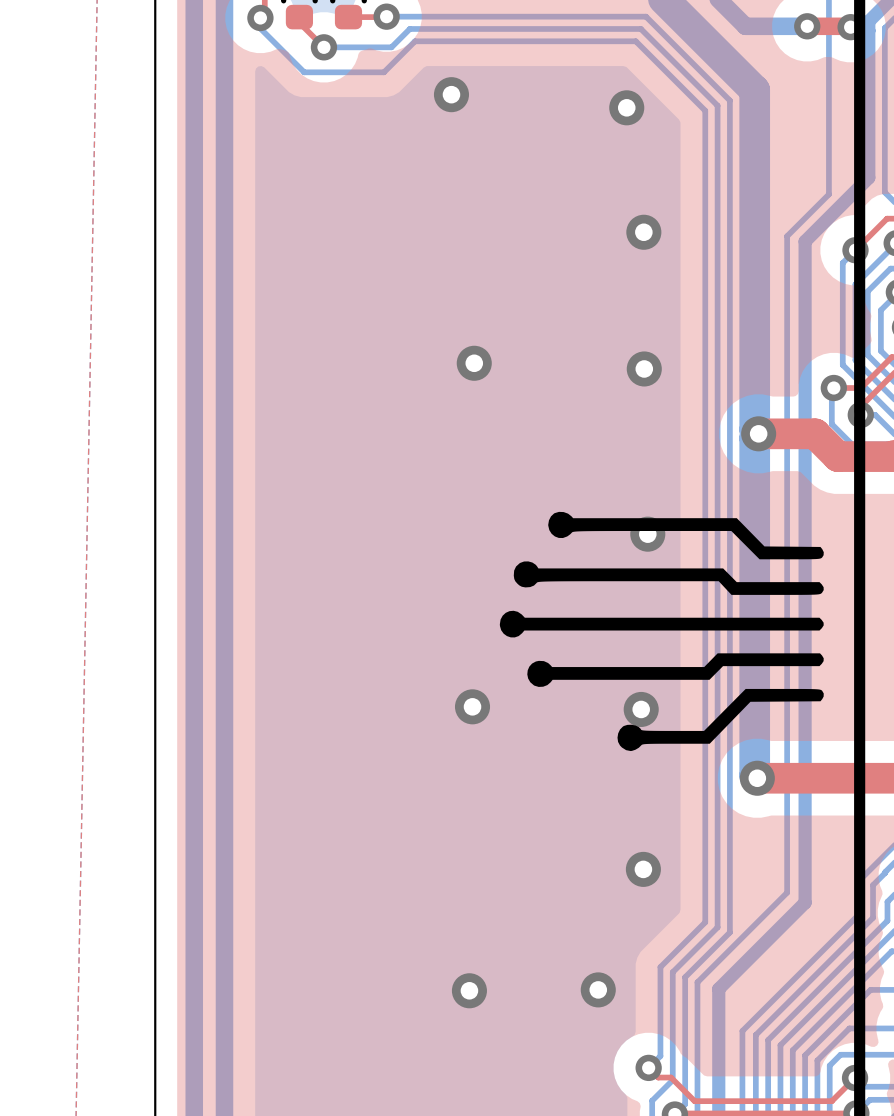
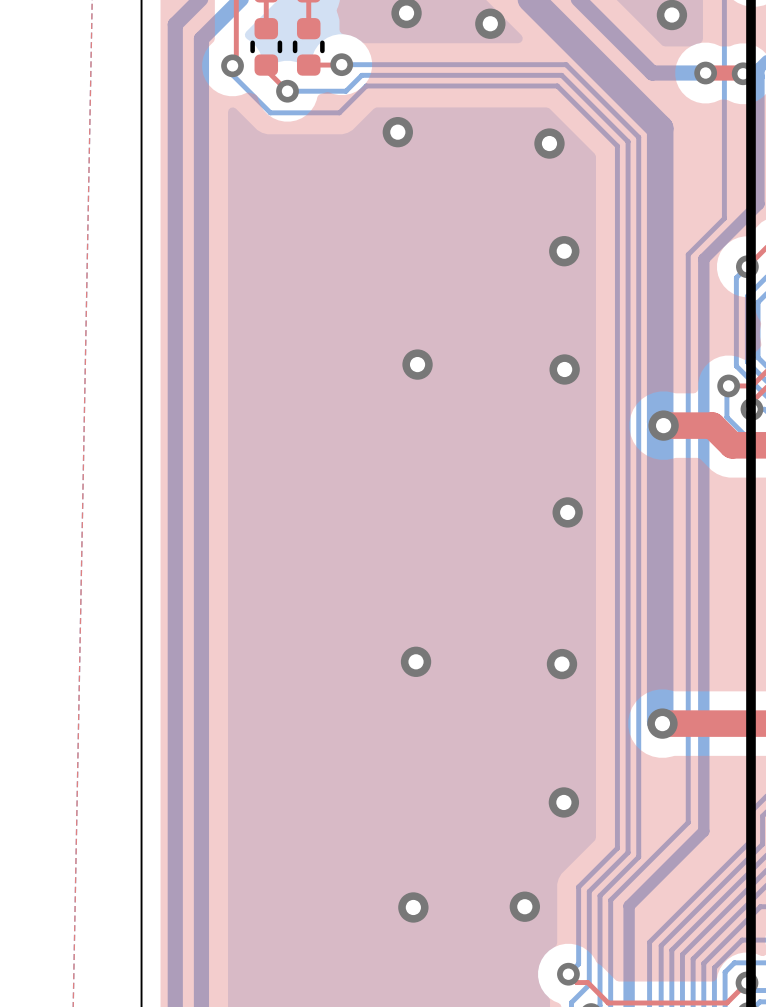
drawing: [499, 511, 824, 752] -> none

